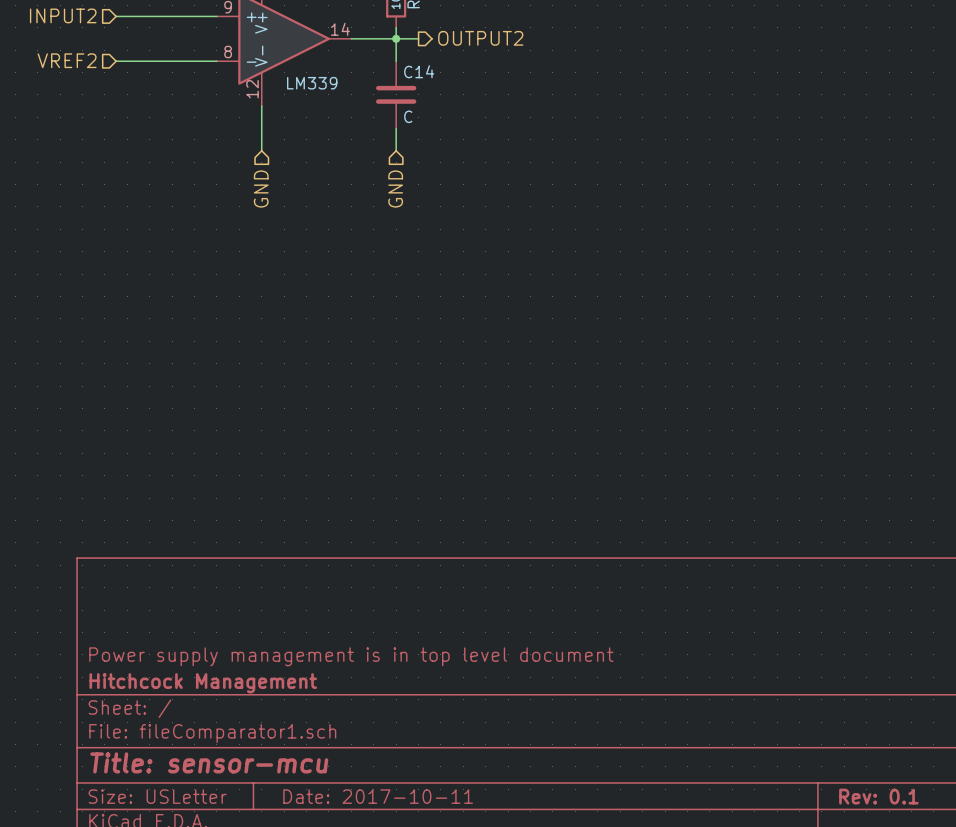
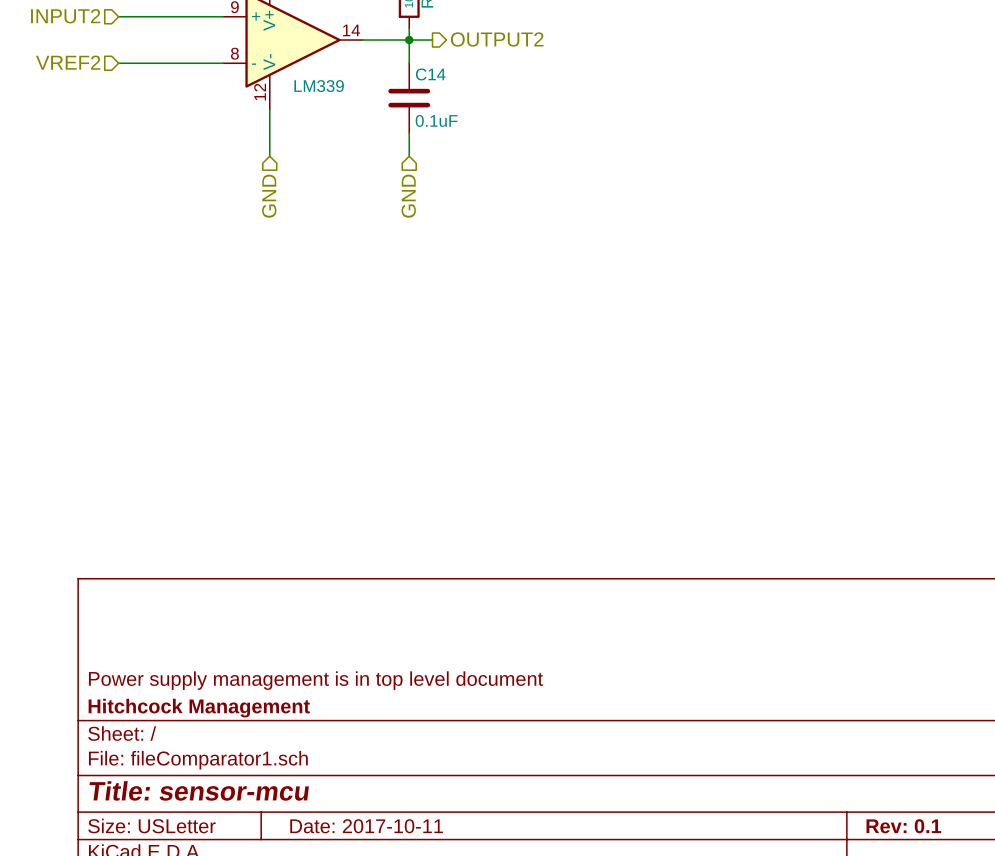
C14 value: C (408, 116) -> 0.1uF (436, 120)

